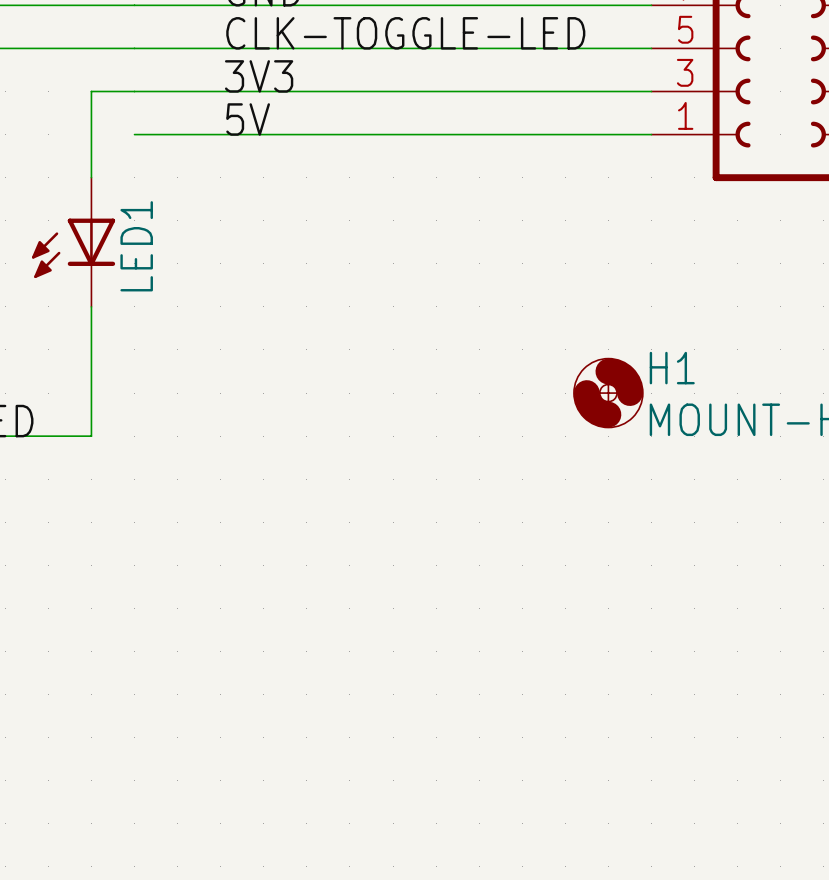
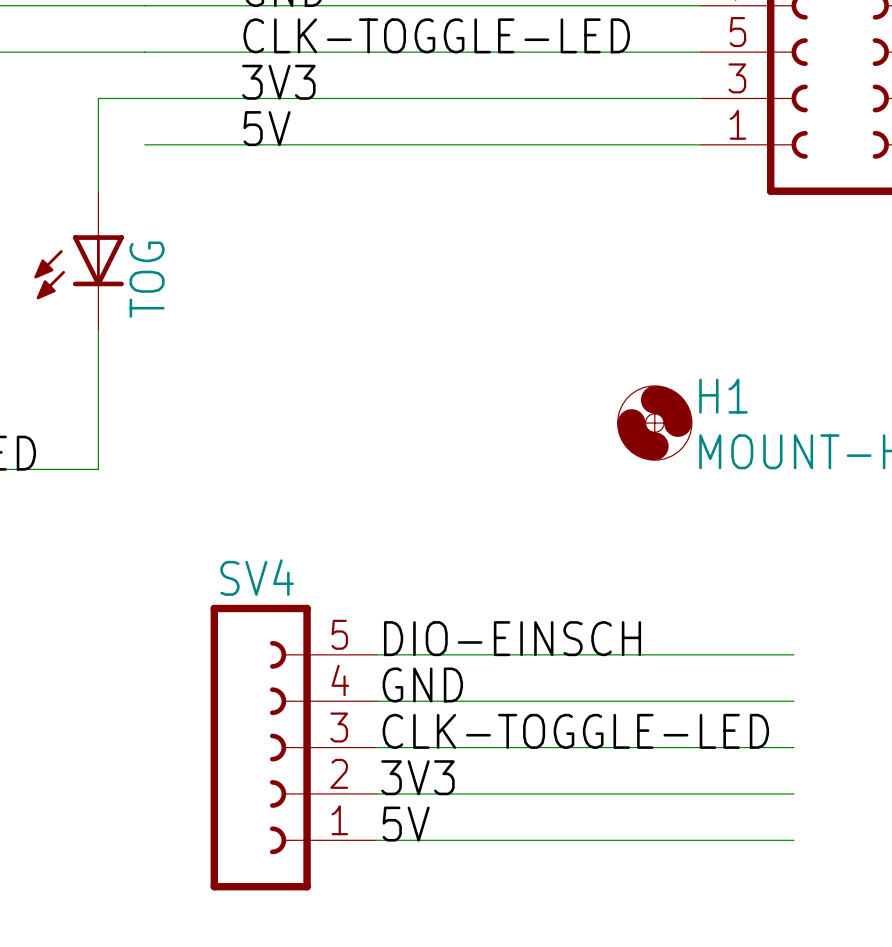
LED1 name: LED1 (136, 246) -> TOG (147, 279)
label: none -> DIO-EINSCH (512, 638)
wire: none -> (376, 654) (793, 654)
label: none -> GND (422, 684)
wire: none -> (376, 701) (793, 701)
label: none -> CLK-TOGGLE-LED (575, 731)
SV4: none -> (293, 747)
wire: none -> (376, 747) (793, 747)
label: none -> 3V3 (417, 777)
wire: none -> (376, 793) (793, 793)
label: none -> 5V (406, 824)
wire: none -> (376, 840) (793, 840)

